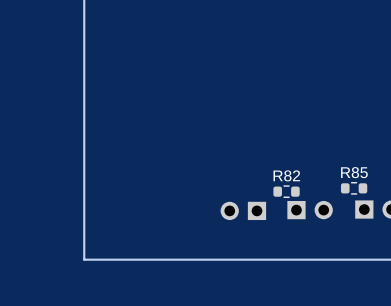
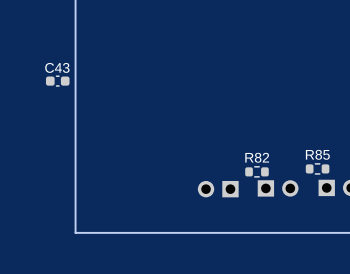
C43: none -> (57, 81)

